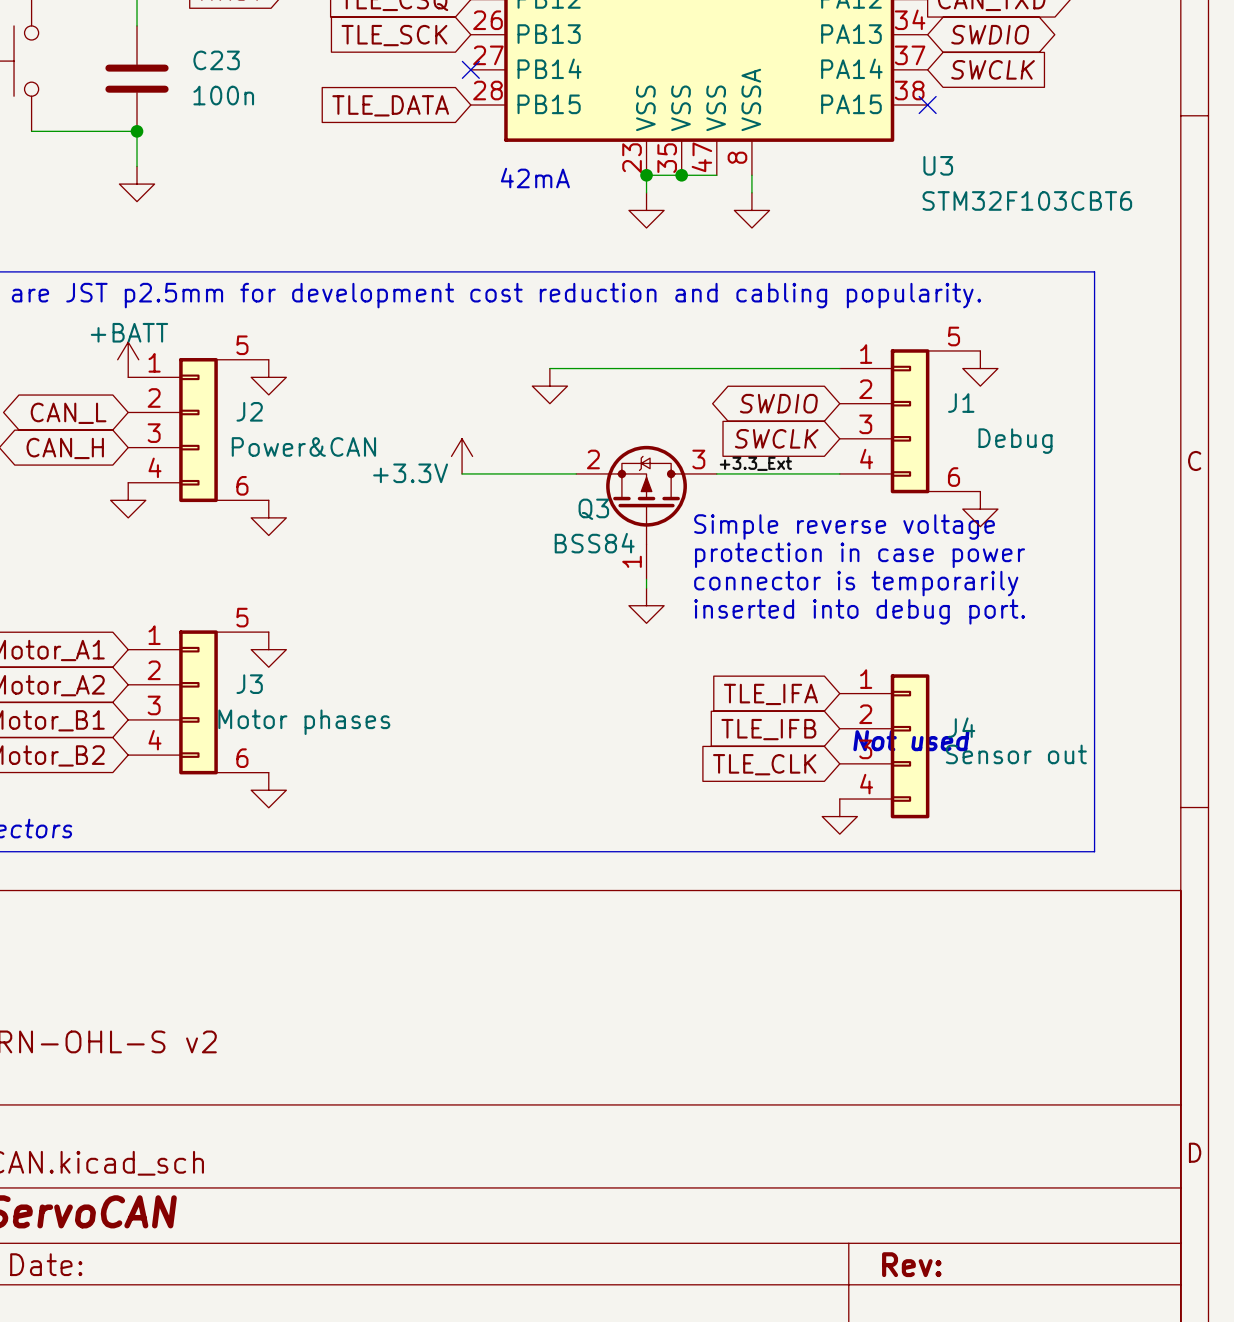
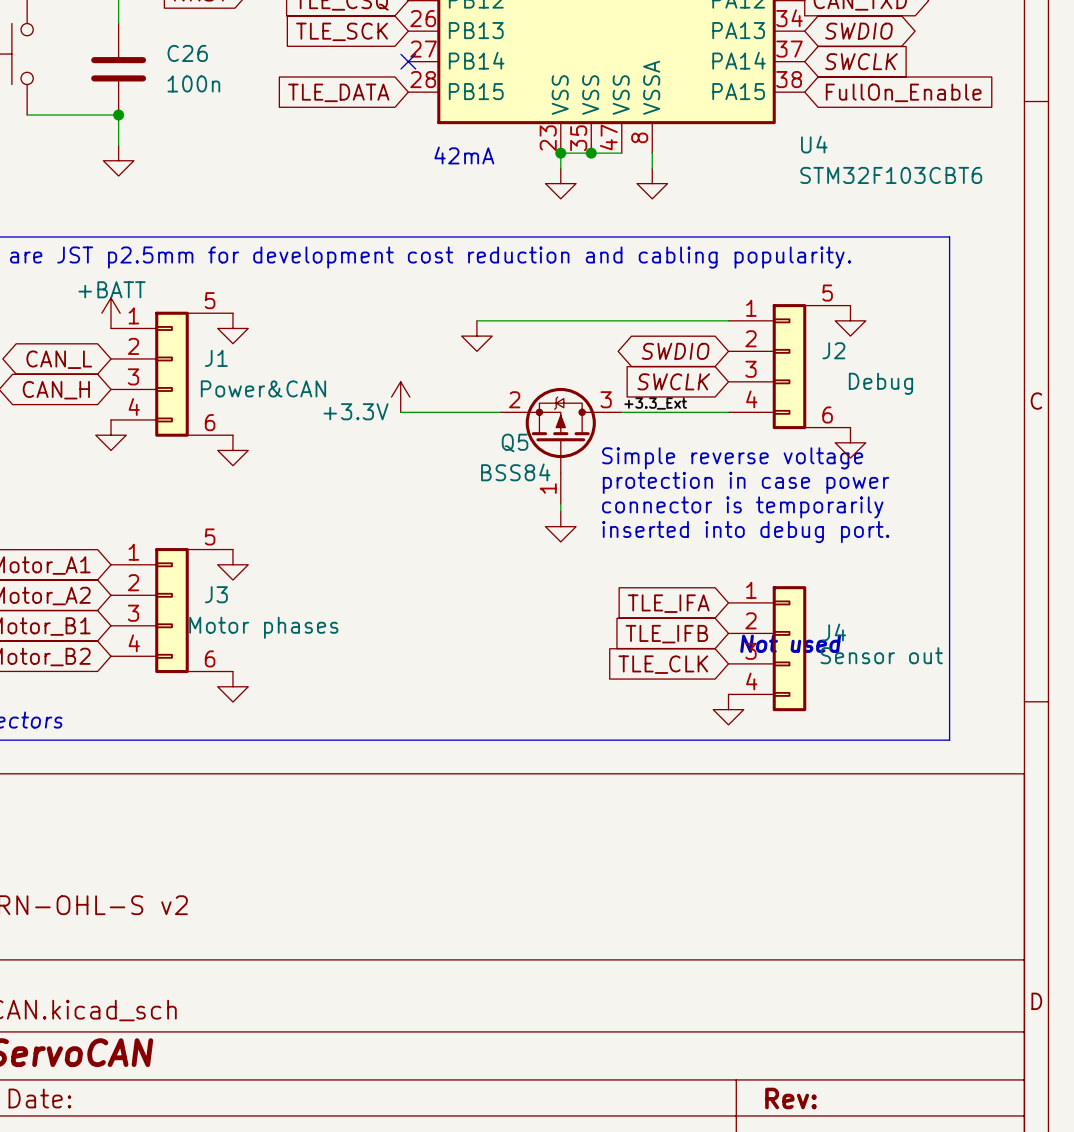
C23 name: C23 (216, 60) -> C26 (187, 53)
no-connect mark: (927, 105) -> none
global label: none -> FullOn_Enable (903, 92)
U3 name: U3 (938, 165) -> U4 (814, 144)
J1 name: J1 (961, 403) -> J2 (833, 350)
J2 name: J2 (249, 411) -> J1 (216, 358)
Q3 name: Q3 (593, 509) -> Q5 (515, 442)

